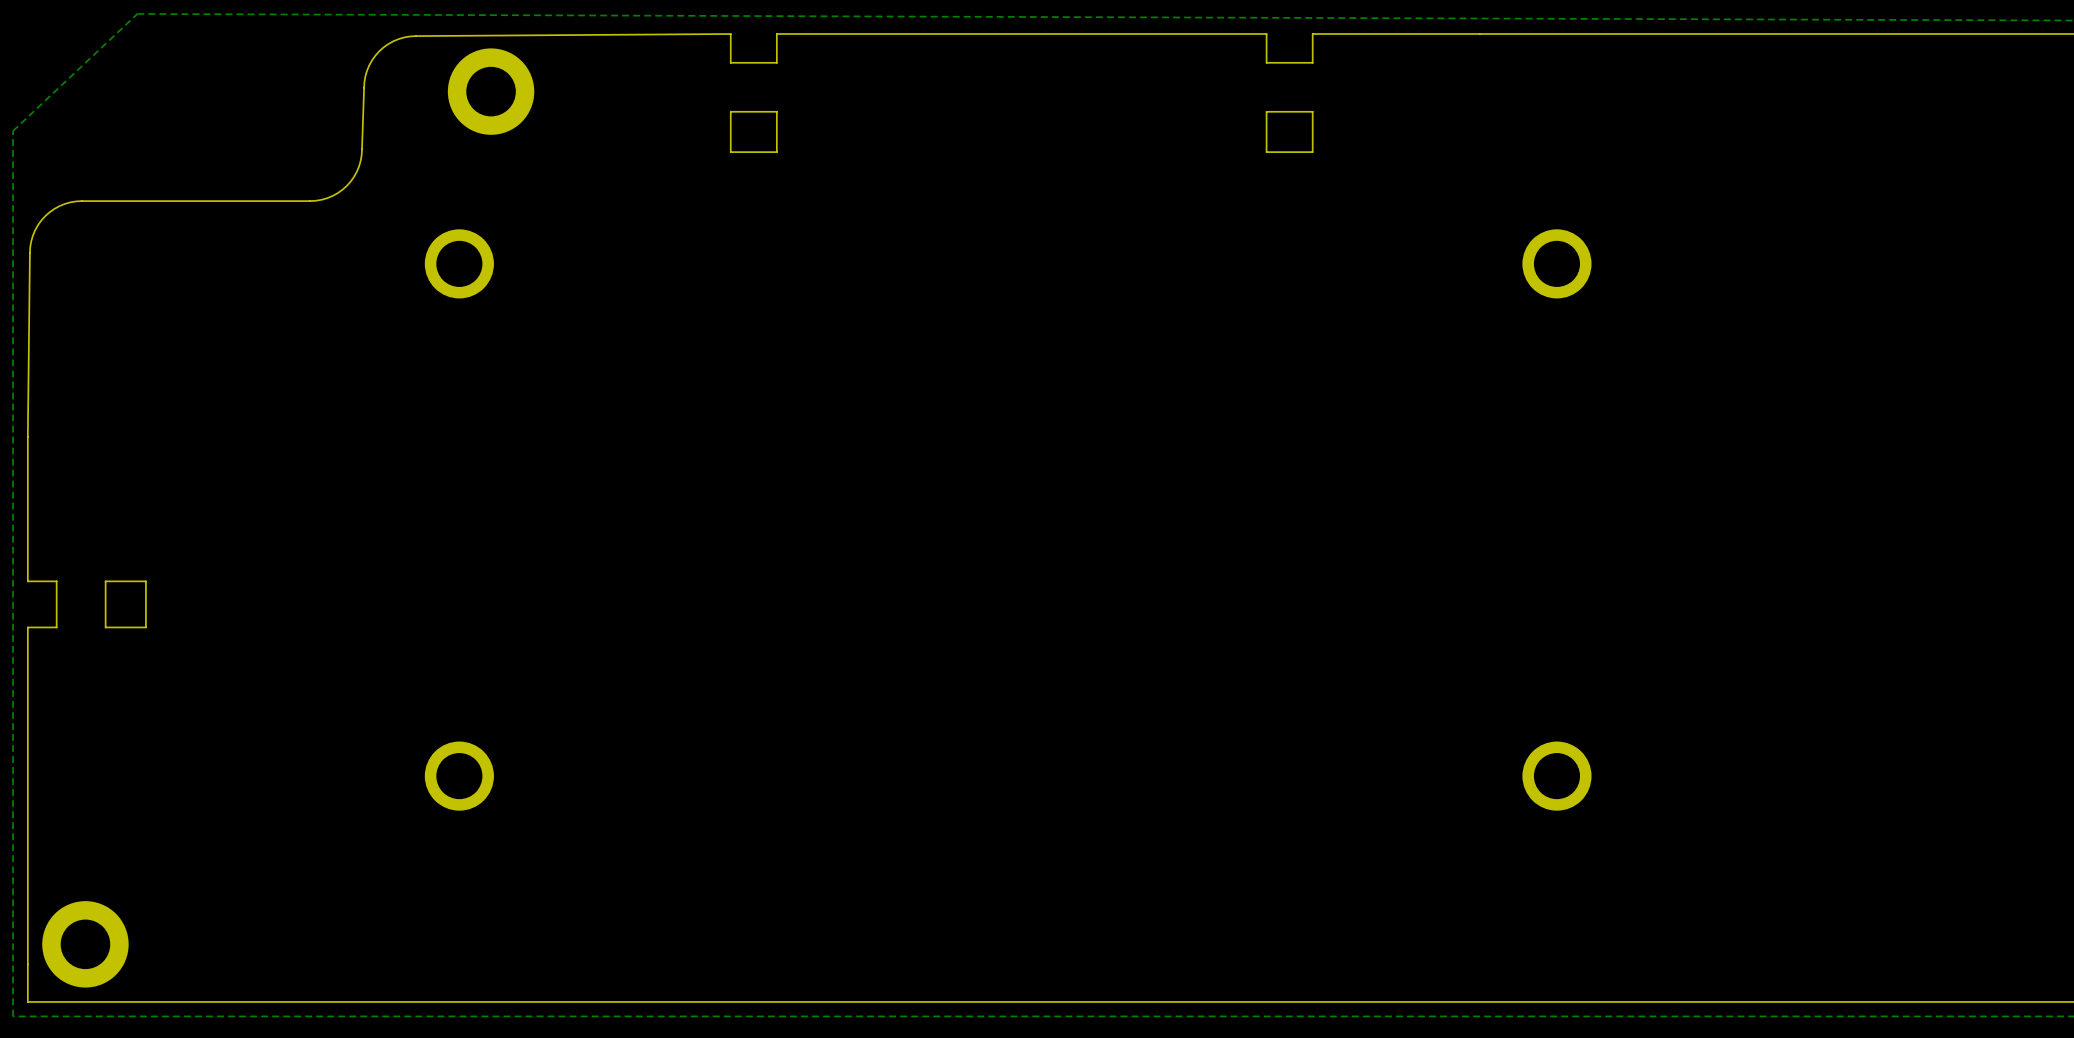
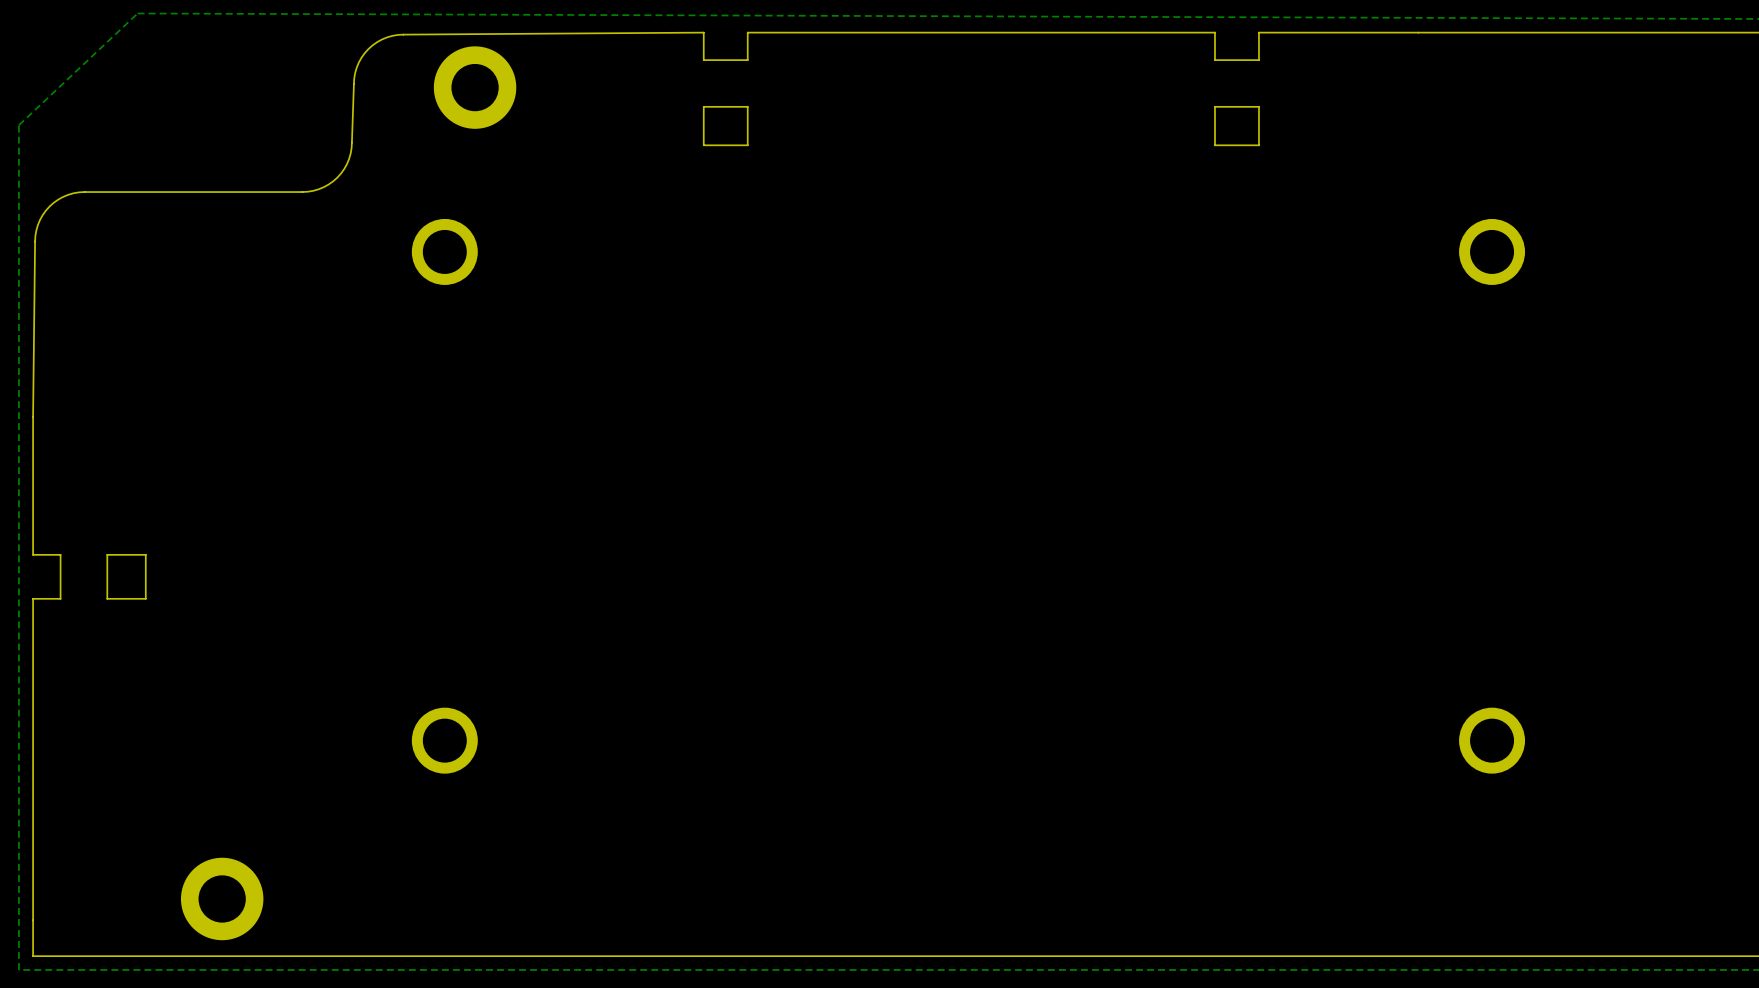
part position: (85, 944) -> (222, 898)

